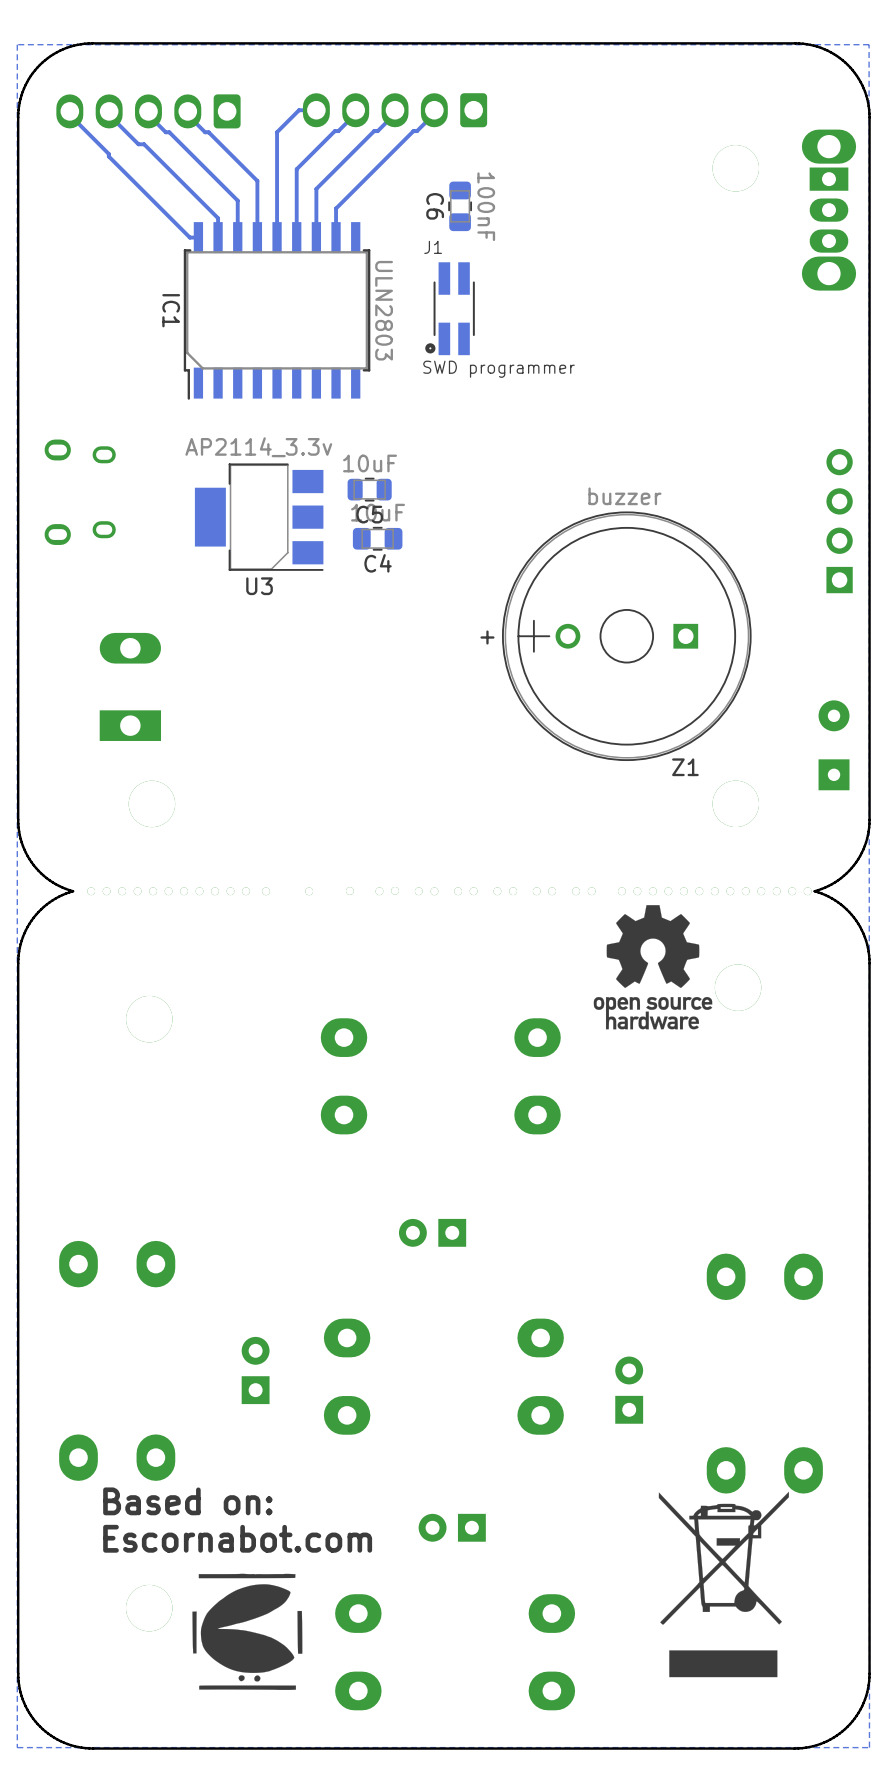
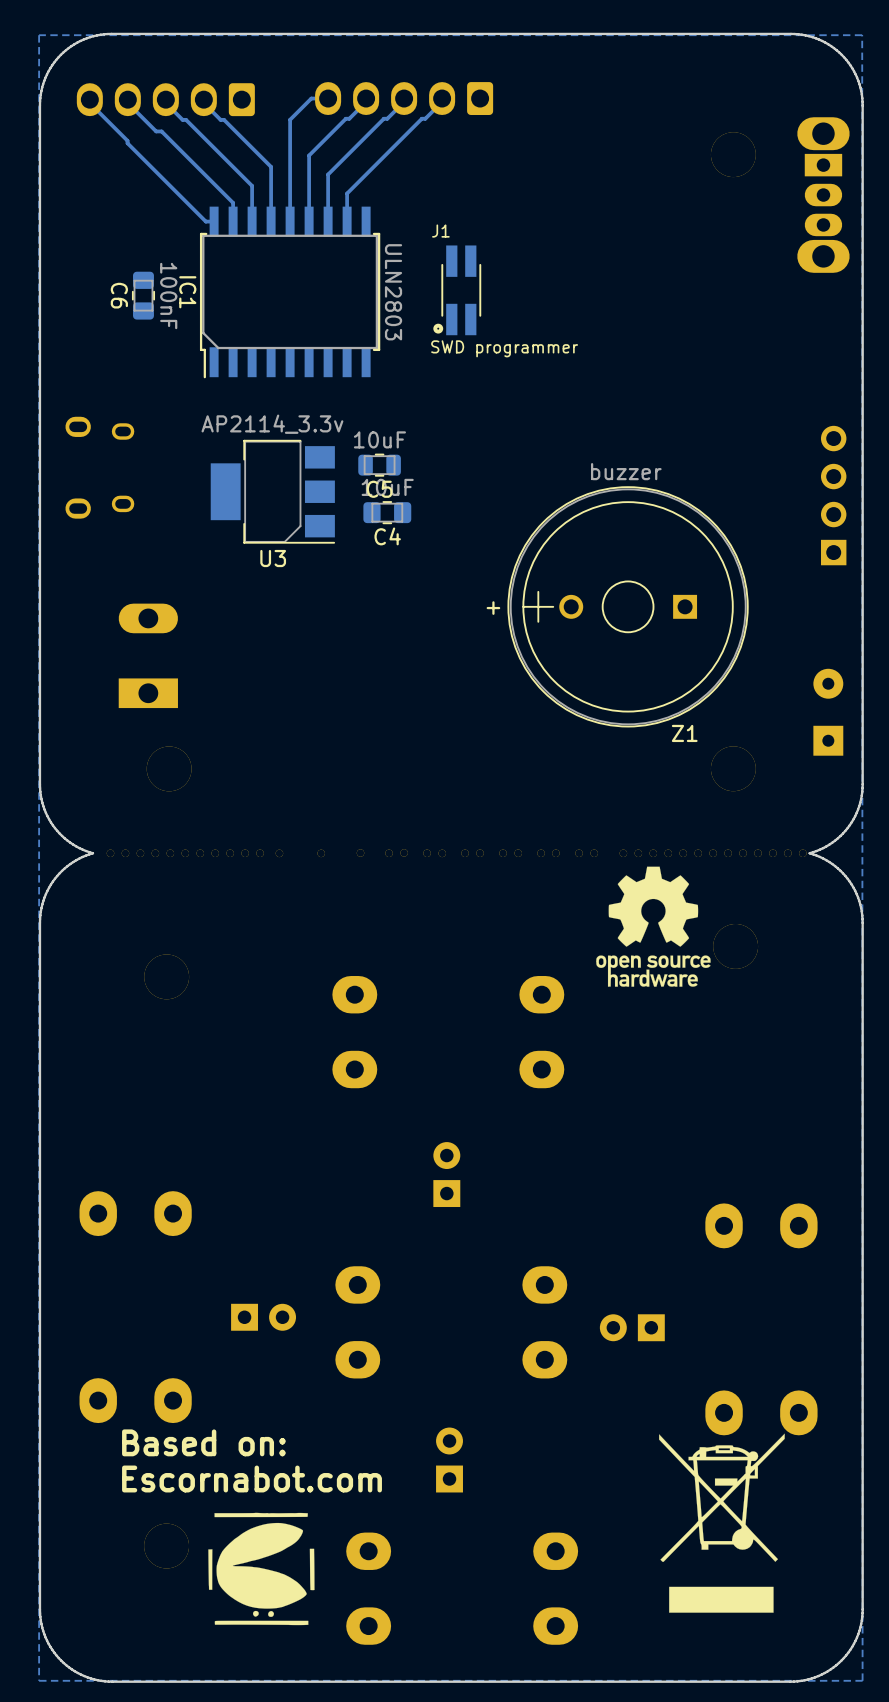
C6 position: (460, 206) -> (143, 295)
part rotation: 0° (432, 1232) -> 90° clockwise (446, 1174)
part rotation: 0° (255, 1370) -> 90° clockwise (263, 1317)
part rotation: 0° (629, 1390) -> 90° counterclockwise (632, 1327)
part rotation: 0° (452, 1527) -> 90° clockwise (449, 1460)

